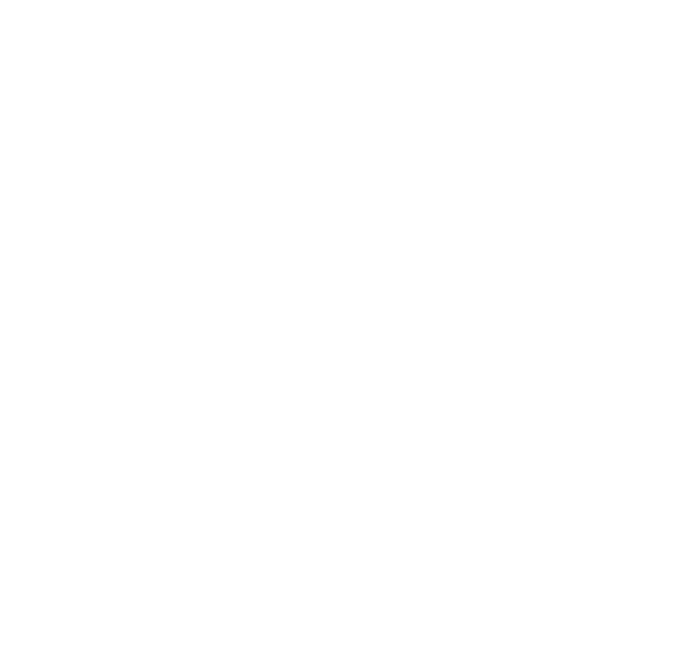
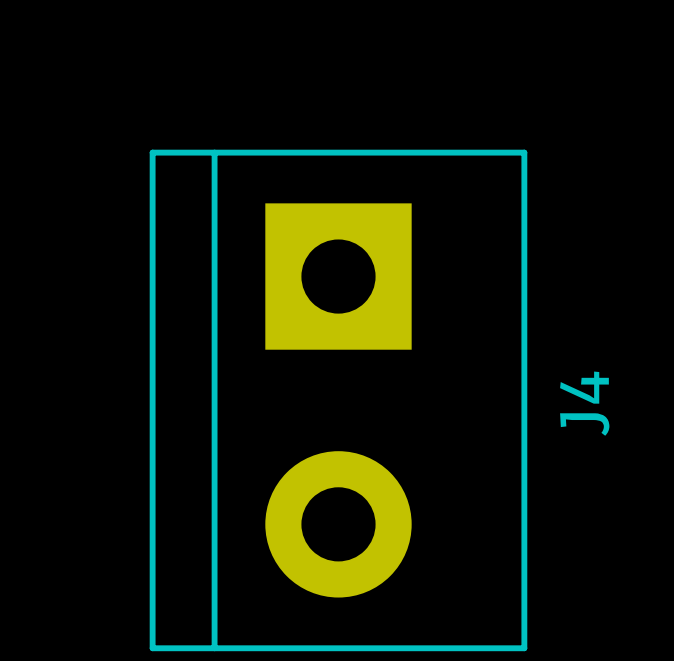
J4: none -> (338, 400)

